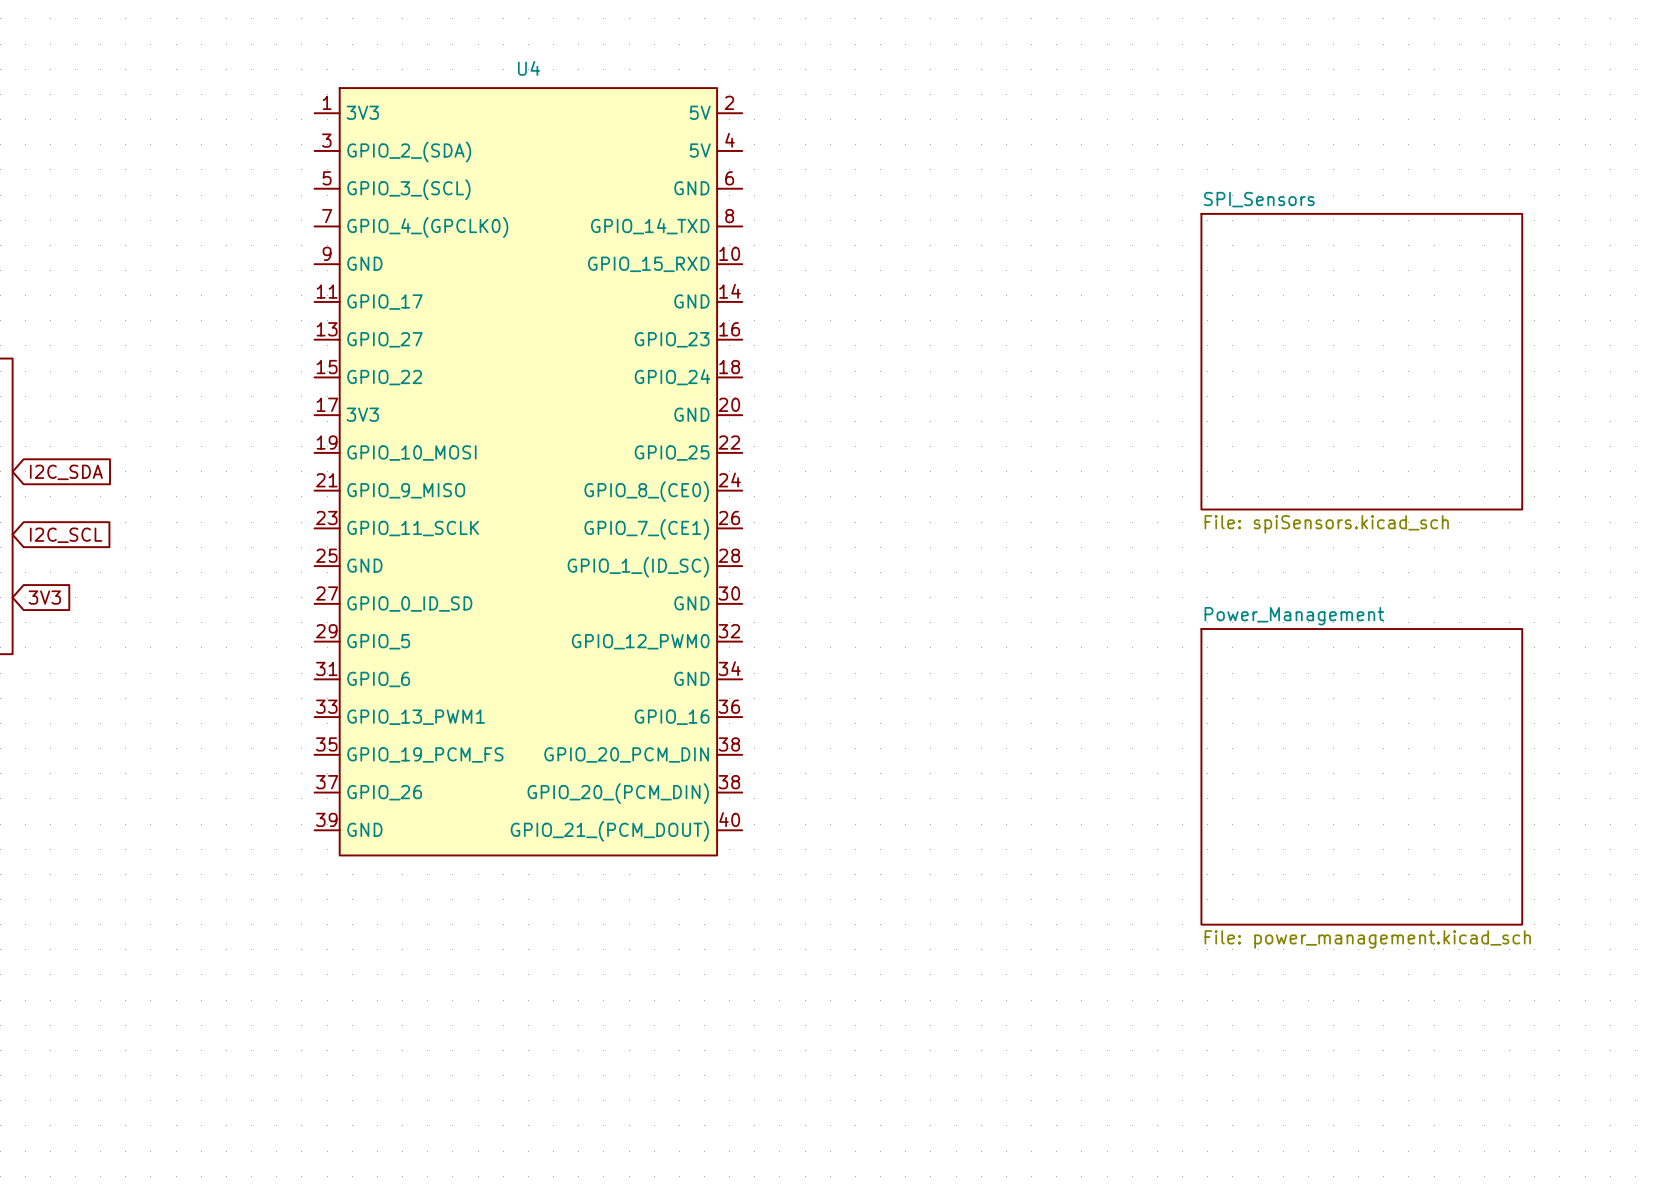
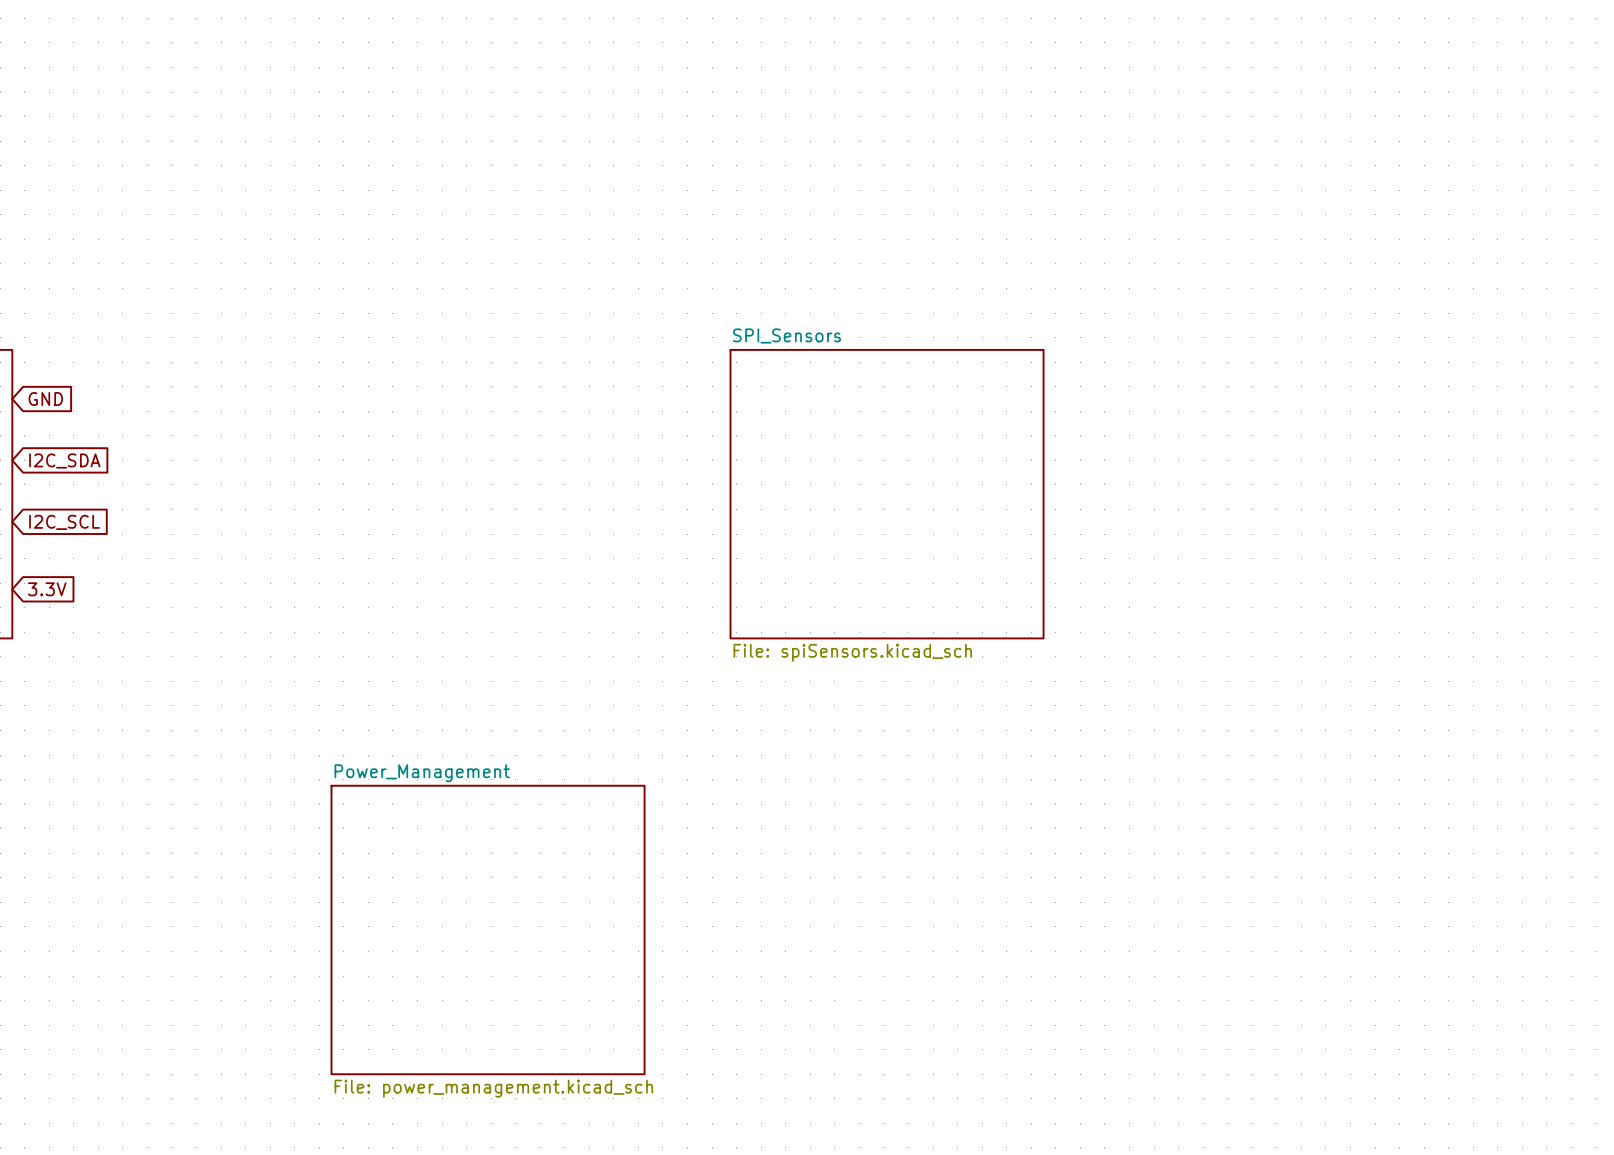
sheet SPI_Sensors: File: spiSensors.kicad_sch (1361, 361) -> none
global label: none -> GND (45, 399)
U4: (528, 471) -> none
sheet SPI_Sensors: none -> File: spiSensors.kicad_sch (887, 494)
global label: 3V3 (44, 597) -> 3.3V (47, 589)
sheet Power_Management: File: power_management.kicad_sch (1361, 776) -> none
sheet Power_Management: none -> File: power_management.kicad_sch (488, 929)

